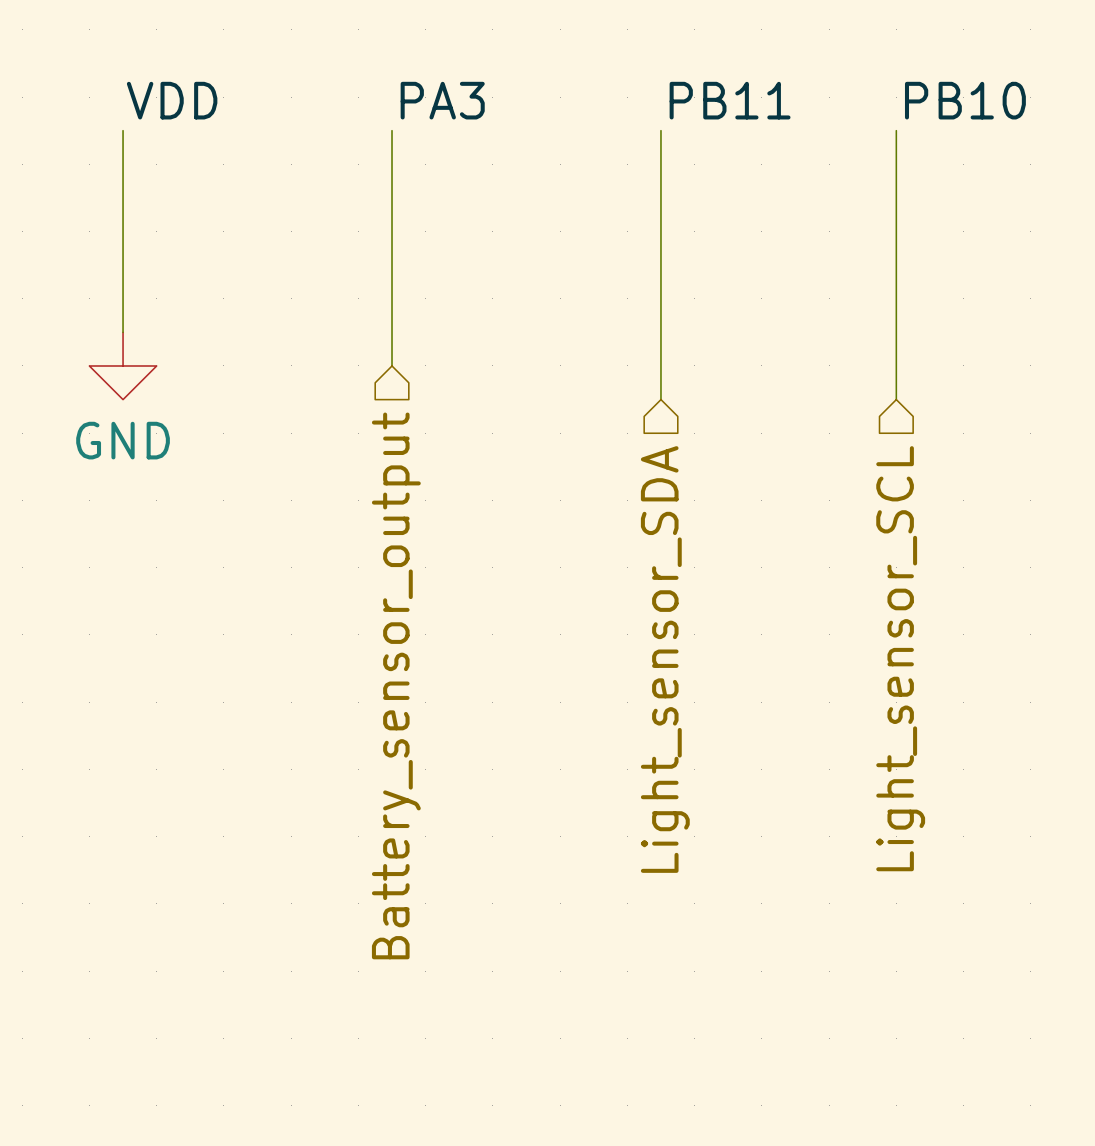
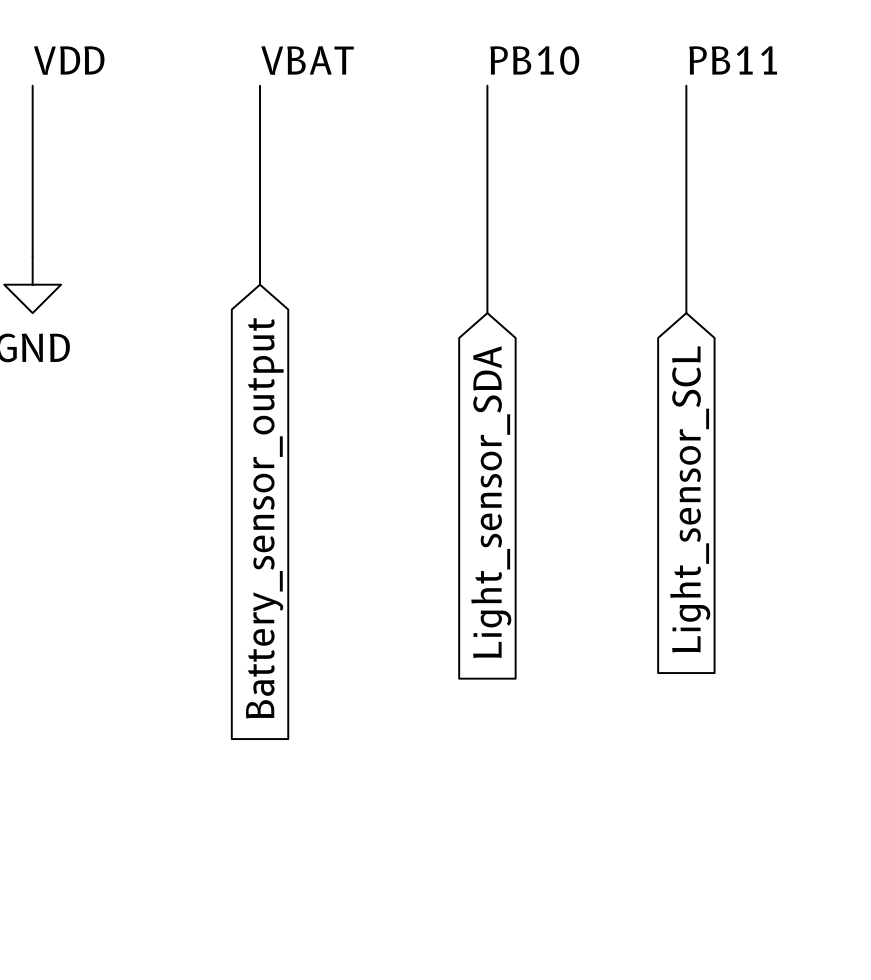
label: PA3 (442, 100) -> VBAT (307, 60)
label: PB11 (730, 100) -> PB10 (534, 60)
label: PB10 (965, 100) -> PB11 (733, 60)
global label: none -> Light_sensor_SCL (690, 499)
global label: none -> Light_sensor_SDA (491, 502)
hierarchical label: Light_sensor_SCL (900, 658) -> none
hierarchical label: Light_sensor_SDA (665, 659) -> none
global label: none -> Battery_sensor_output (264, 518)
hierarchical label: Battery_sensor_output (396, 685) -> none

